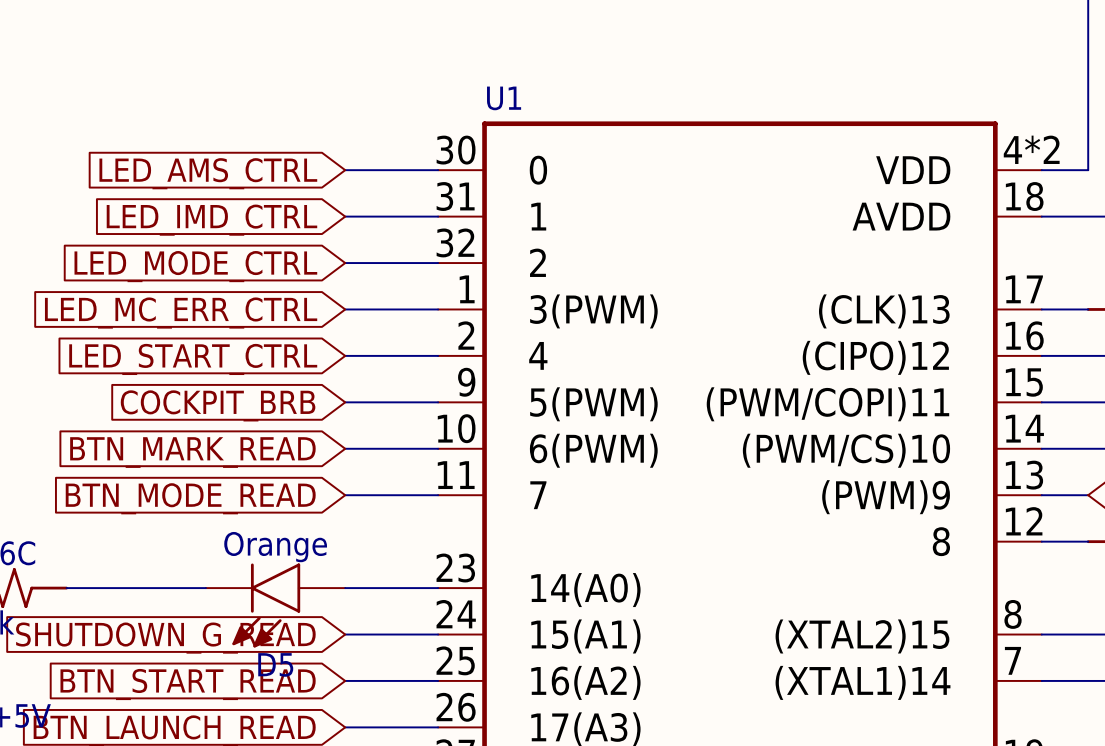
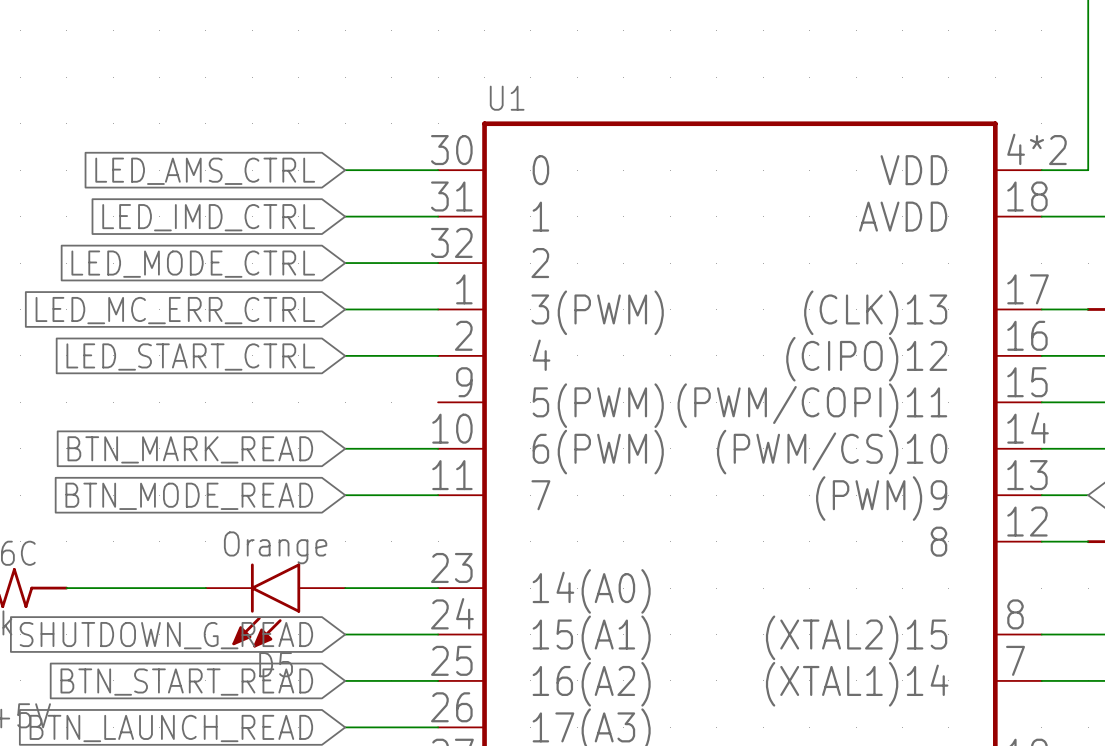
wire: (345, 402) (438, 402) -> none
global label: COCKPIT_BRB (218, 405) -> none

